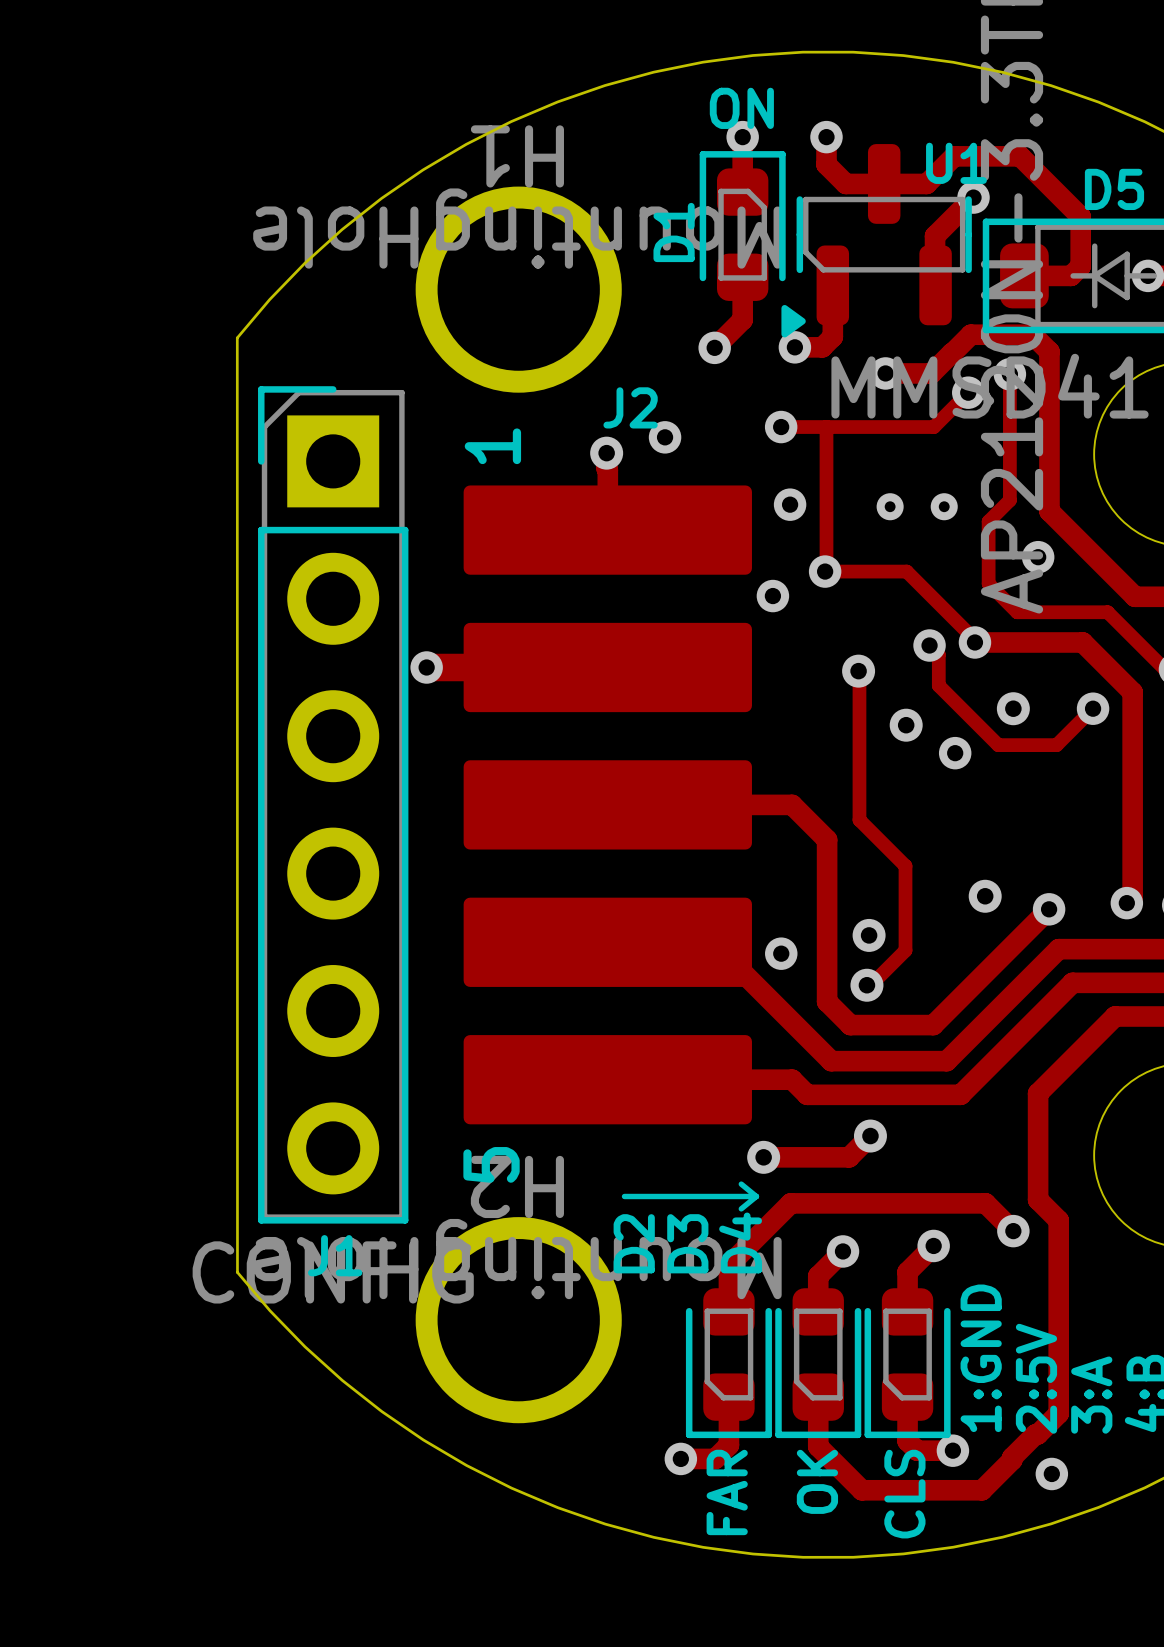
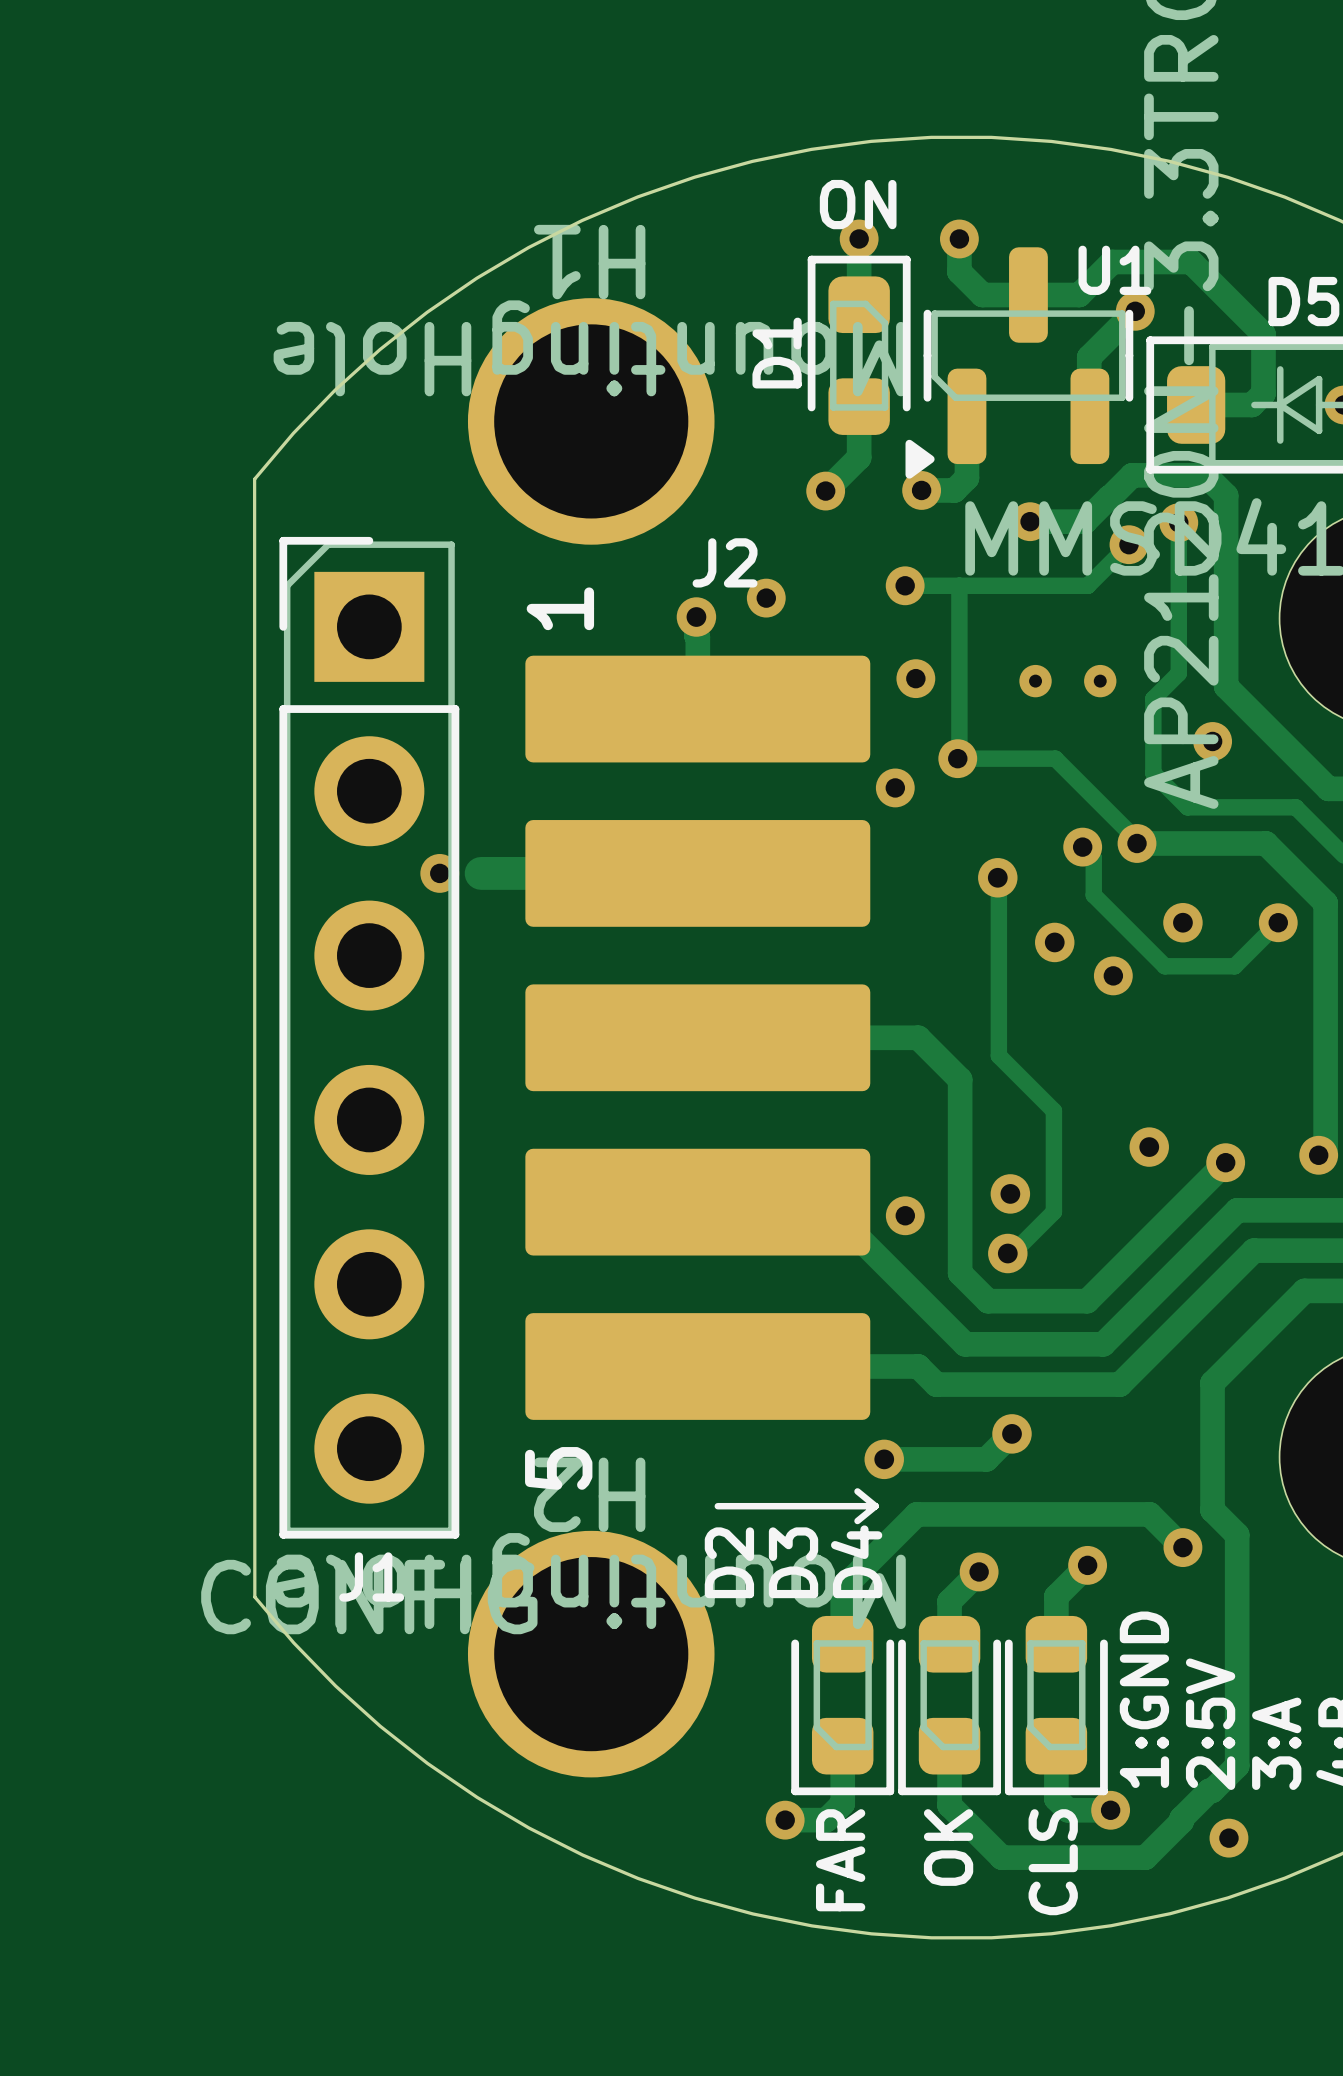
via position: (426, 667) -> (439, 873)

